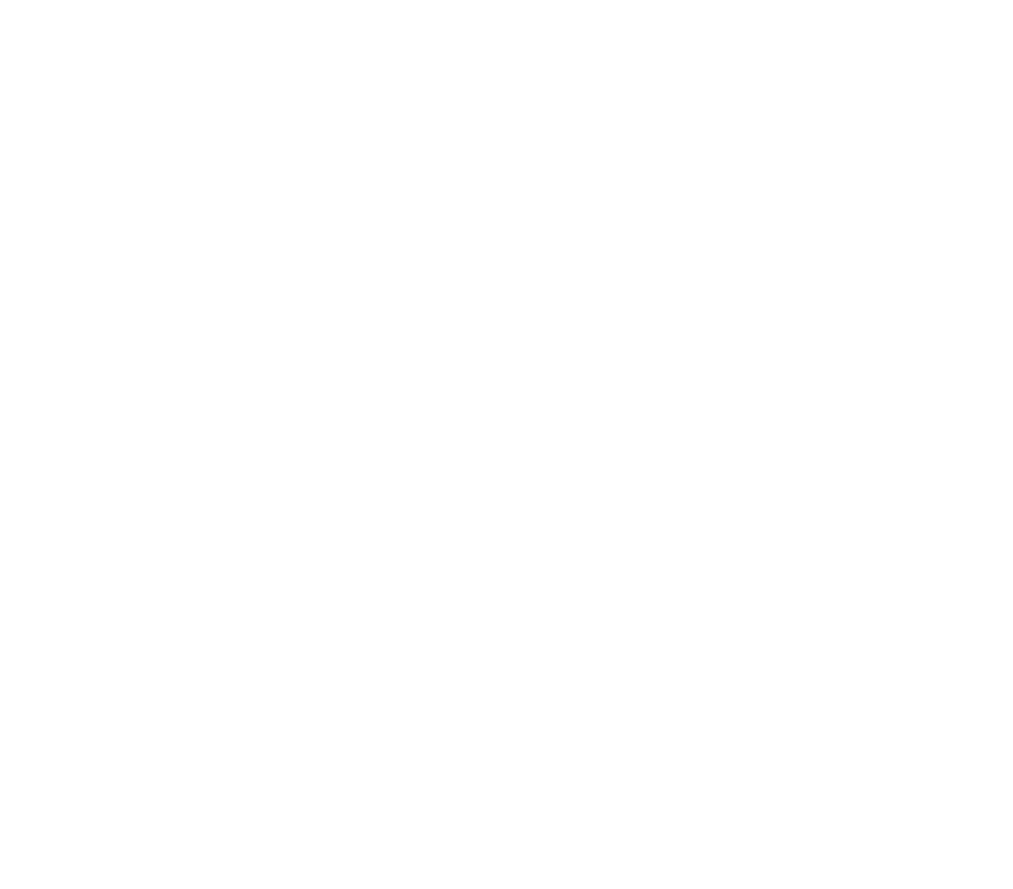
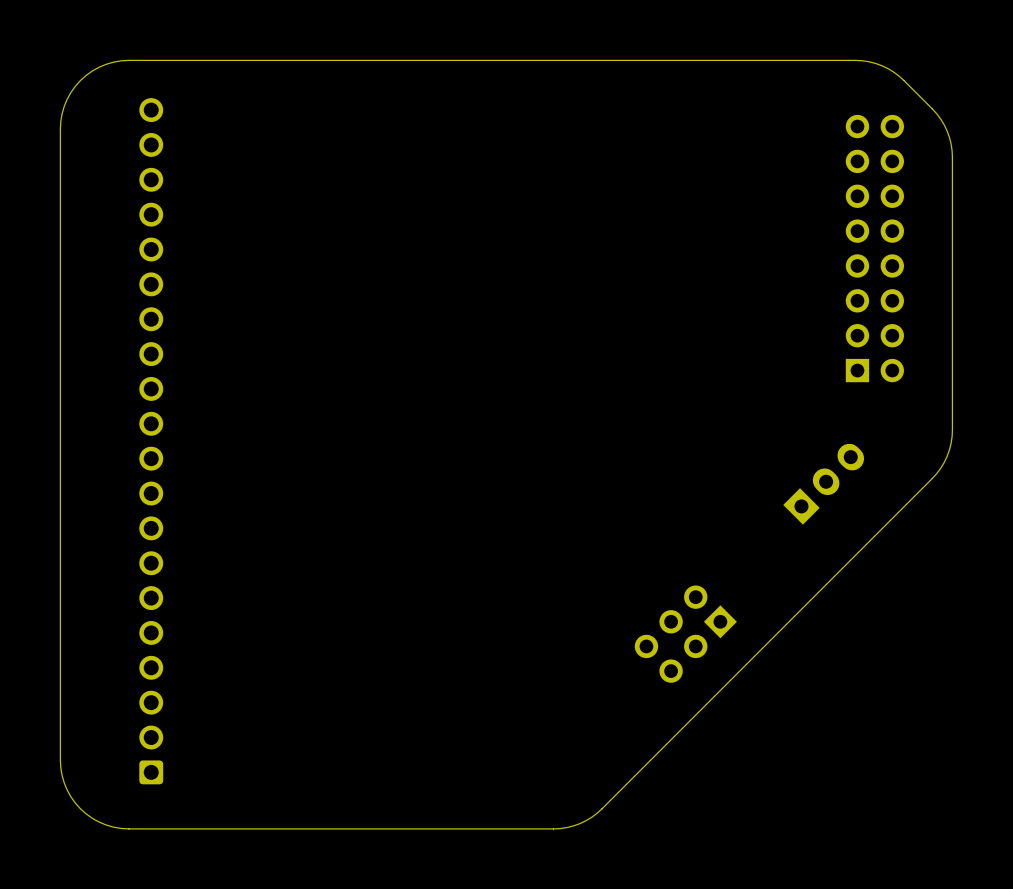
board edge: none -> (855, 60) (129, 60) (113, 62) (99, 67) (80, 80) (67, 99) (62, 113) (60, 129) (60, 760) (64, 782) (70, 796) (80, 808) (92, 818) (106, 825) (129, 828) (553, 828) (579, 823) (601, 808) (932, 478) (944, 462) (949, 449) (952, 429) (951, 144) (947, 131) (936, 113) (898, 75) (881, 65) (855, 60)
part: none -> (874, 248)
part: none -> (151, 441)
part: none -> (823, 484)
part: none -> (685, 634)

